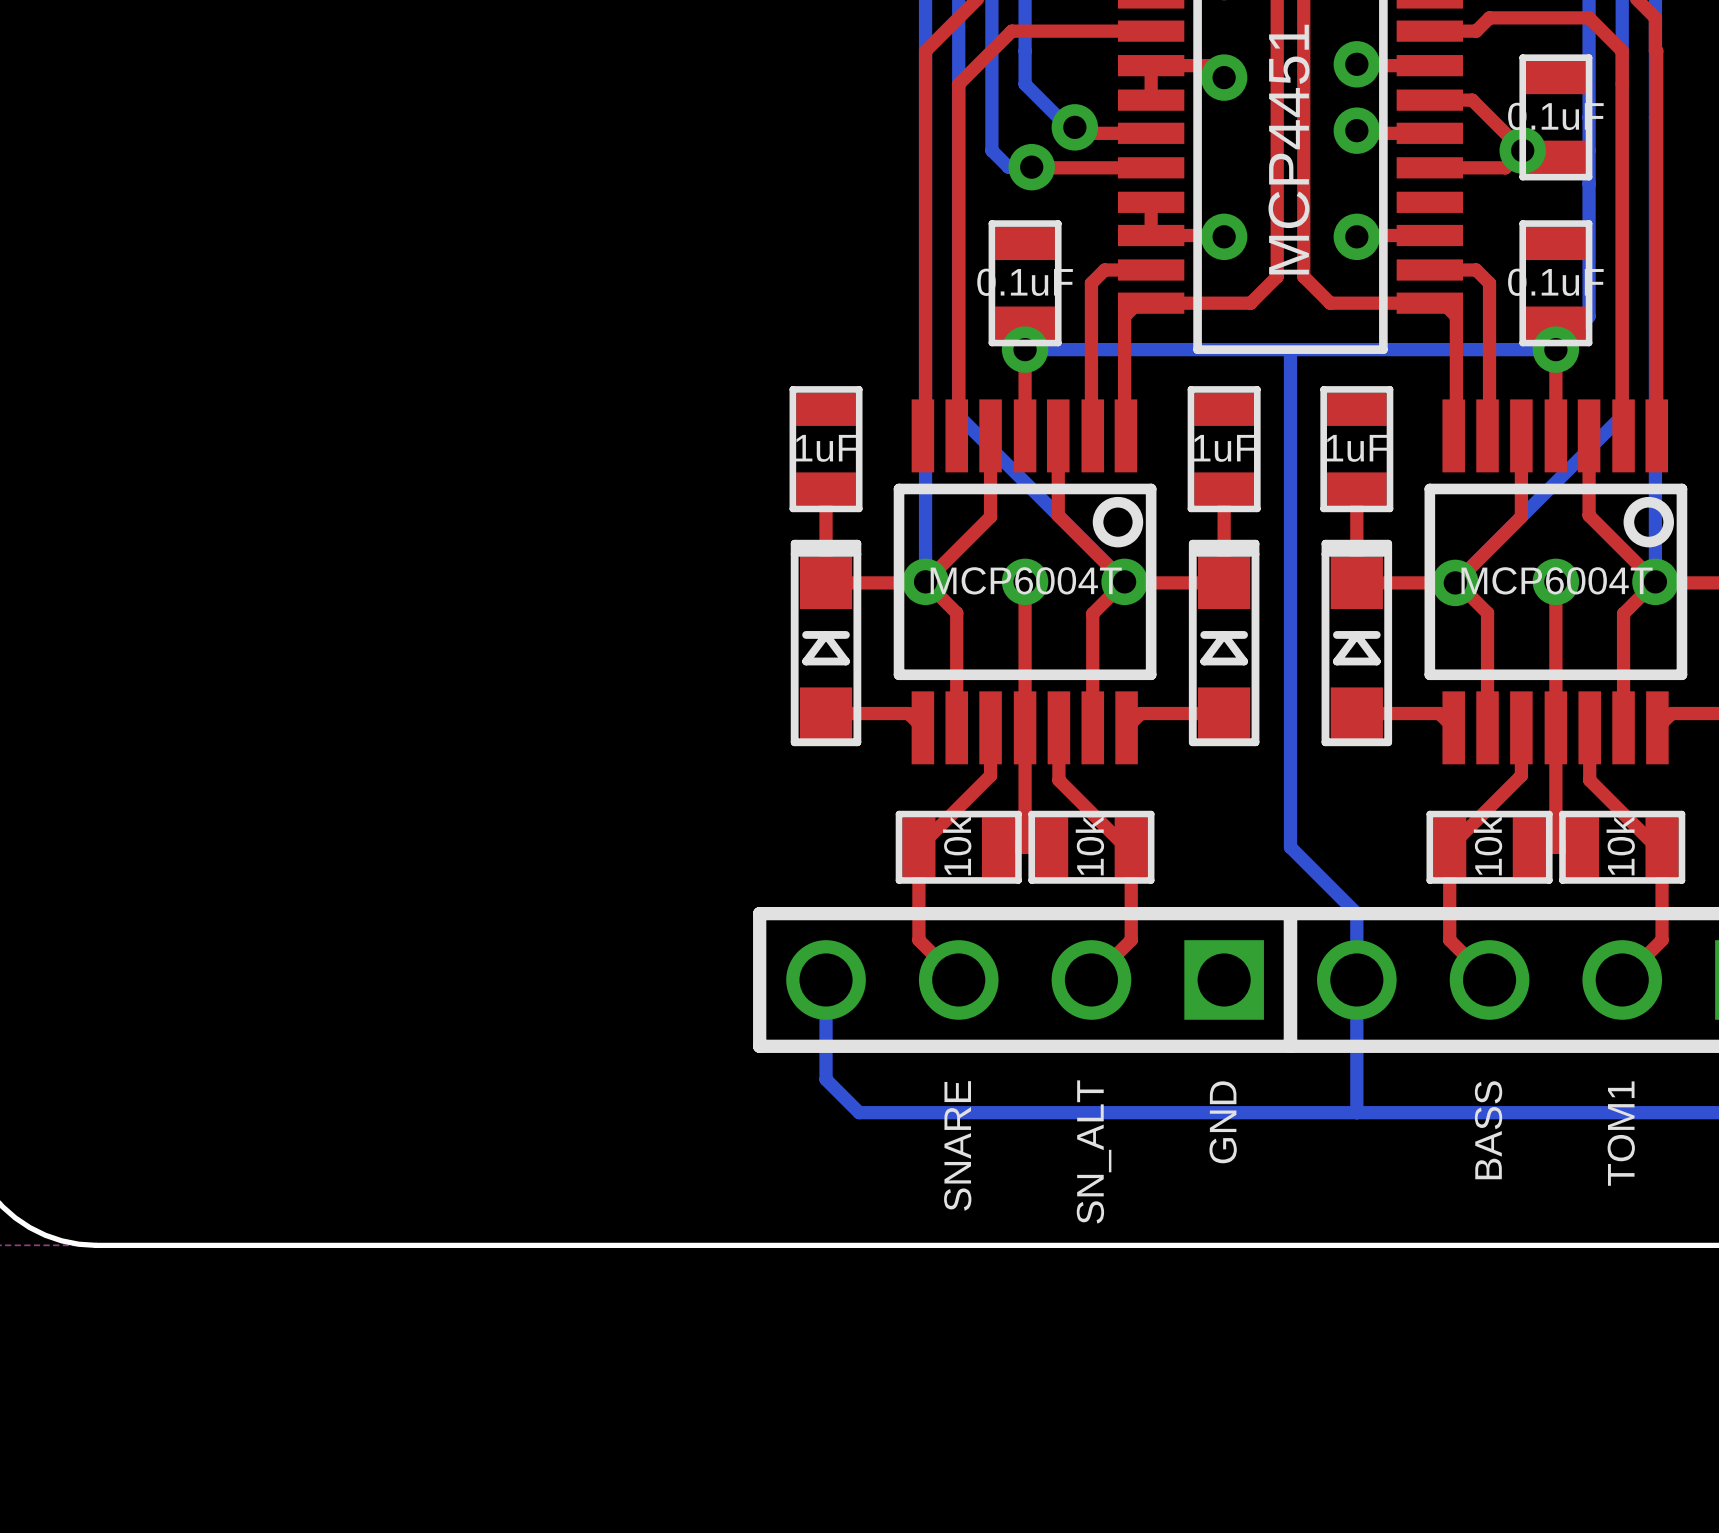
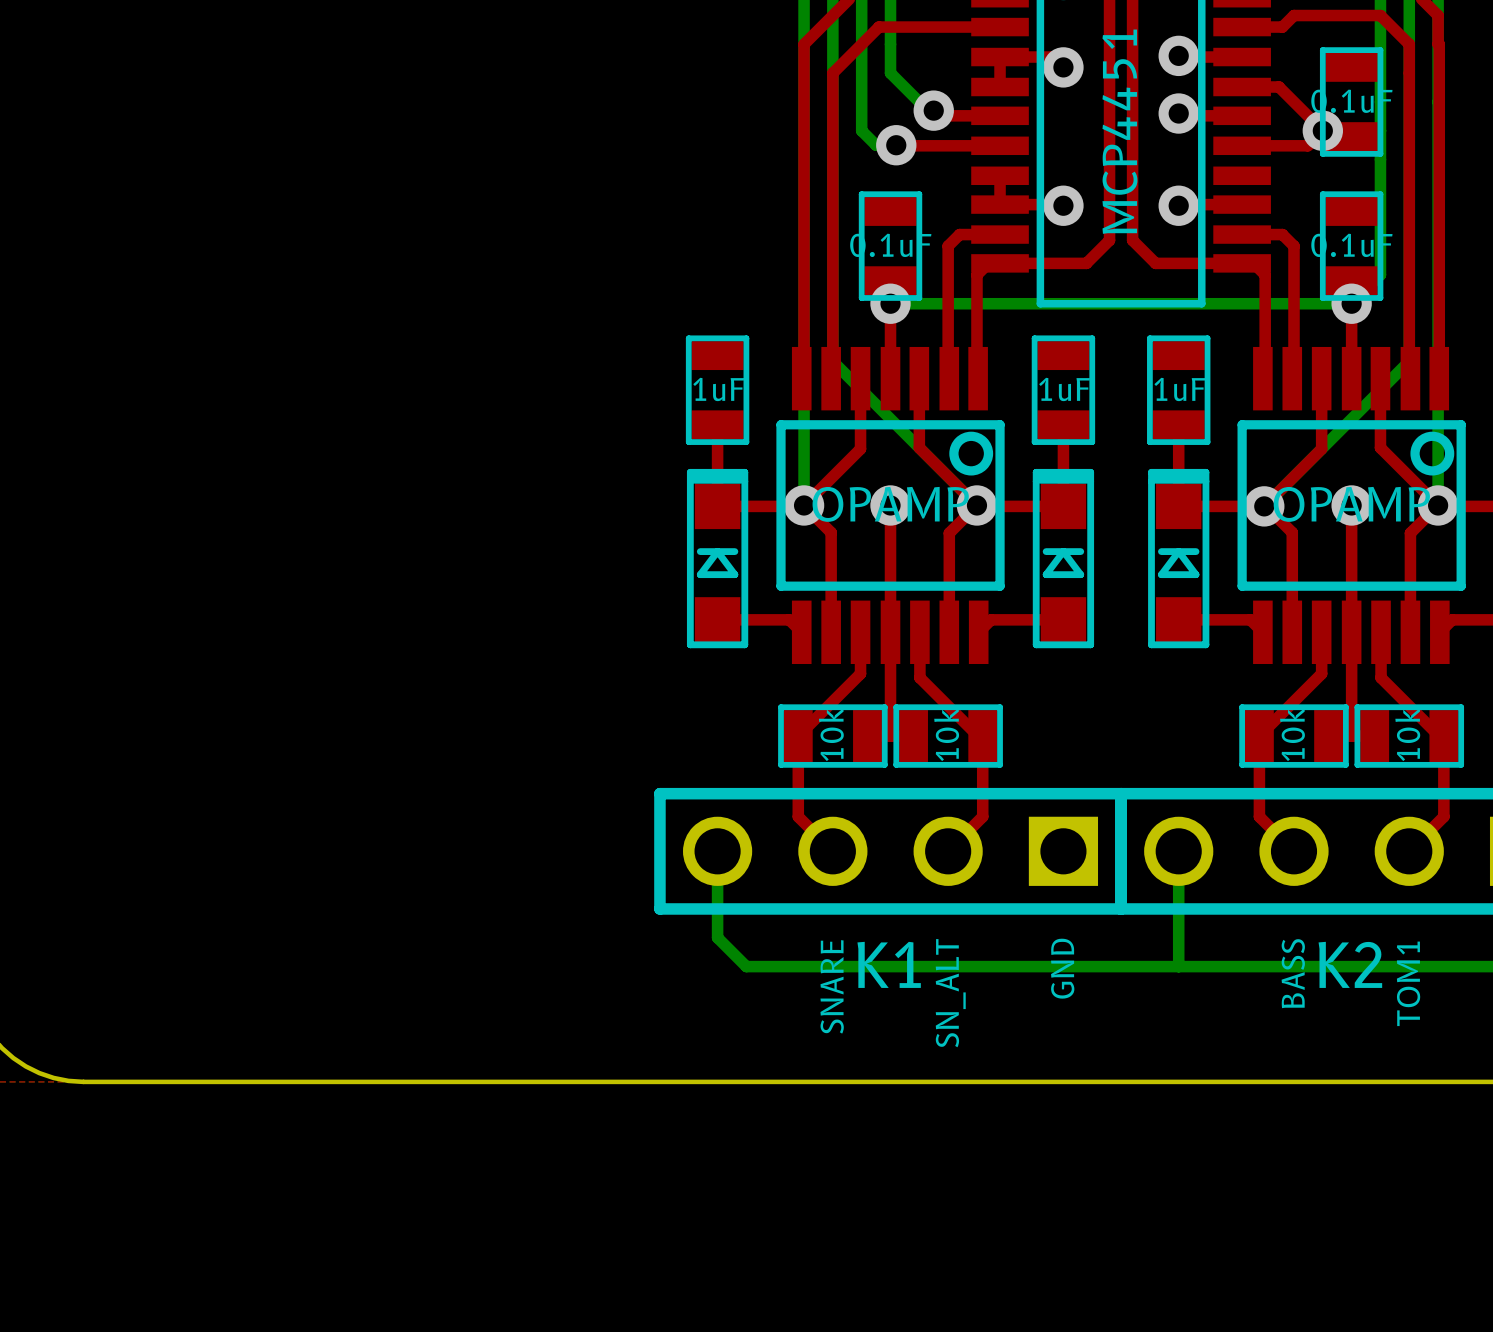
bottom track: (1290, 349) (1290, 847) (1356, 913) (1356, 979) -> none
part value: MCP6004T (1026, 580) -> OPAMP (890, 504)
part value: MCP6004T (1557, 580) -> OPAMP (1351, 504)
K1 name: none -> K1 (889, 964)
K2 name: none -> K2 (1350, 964)

